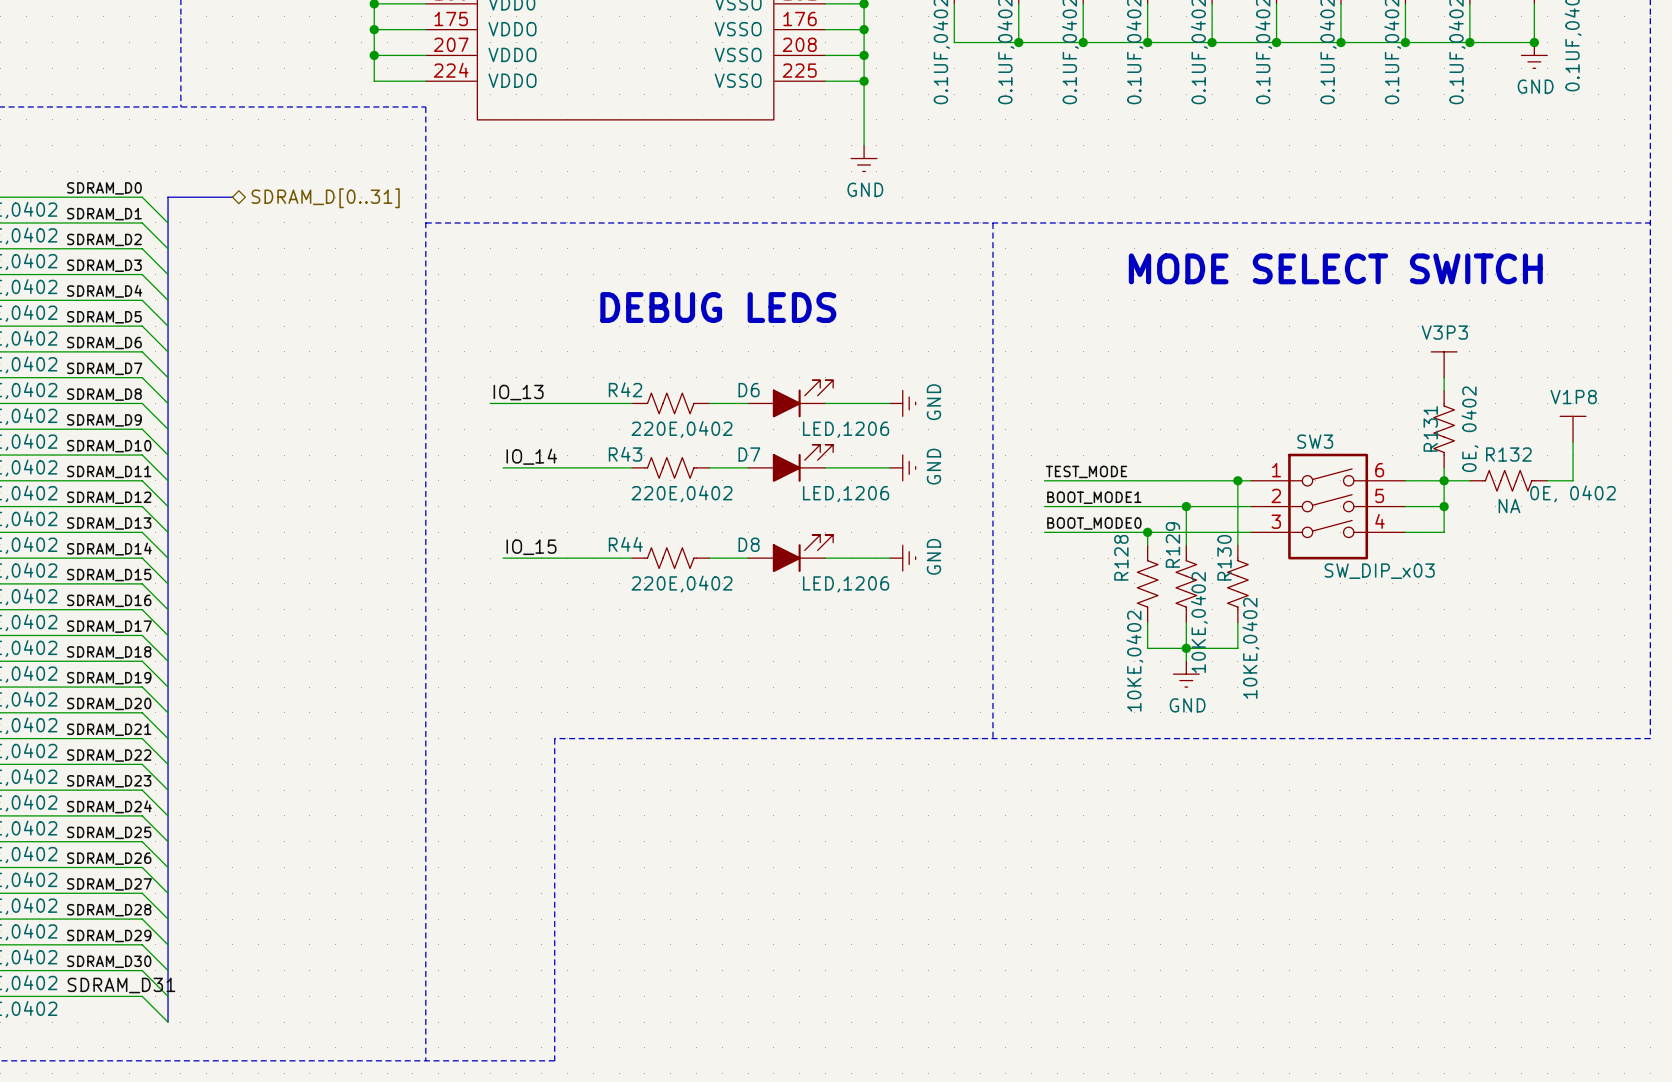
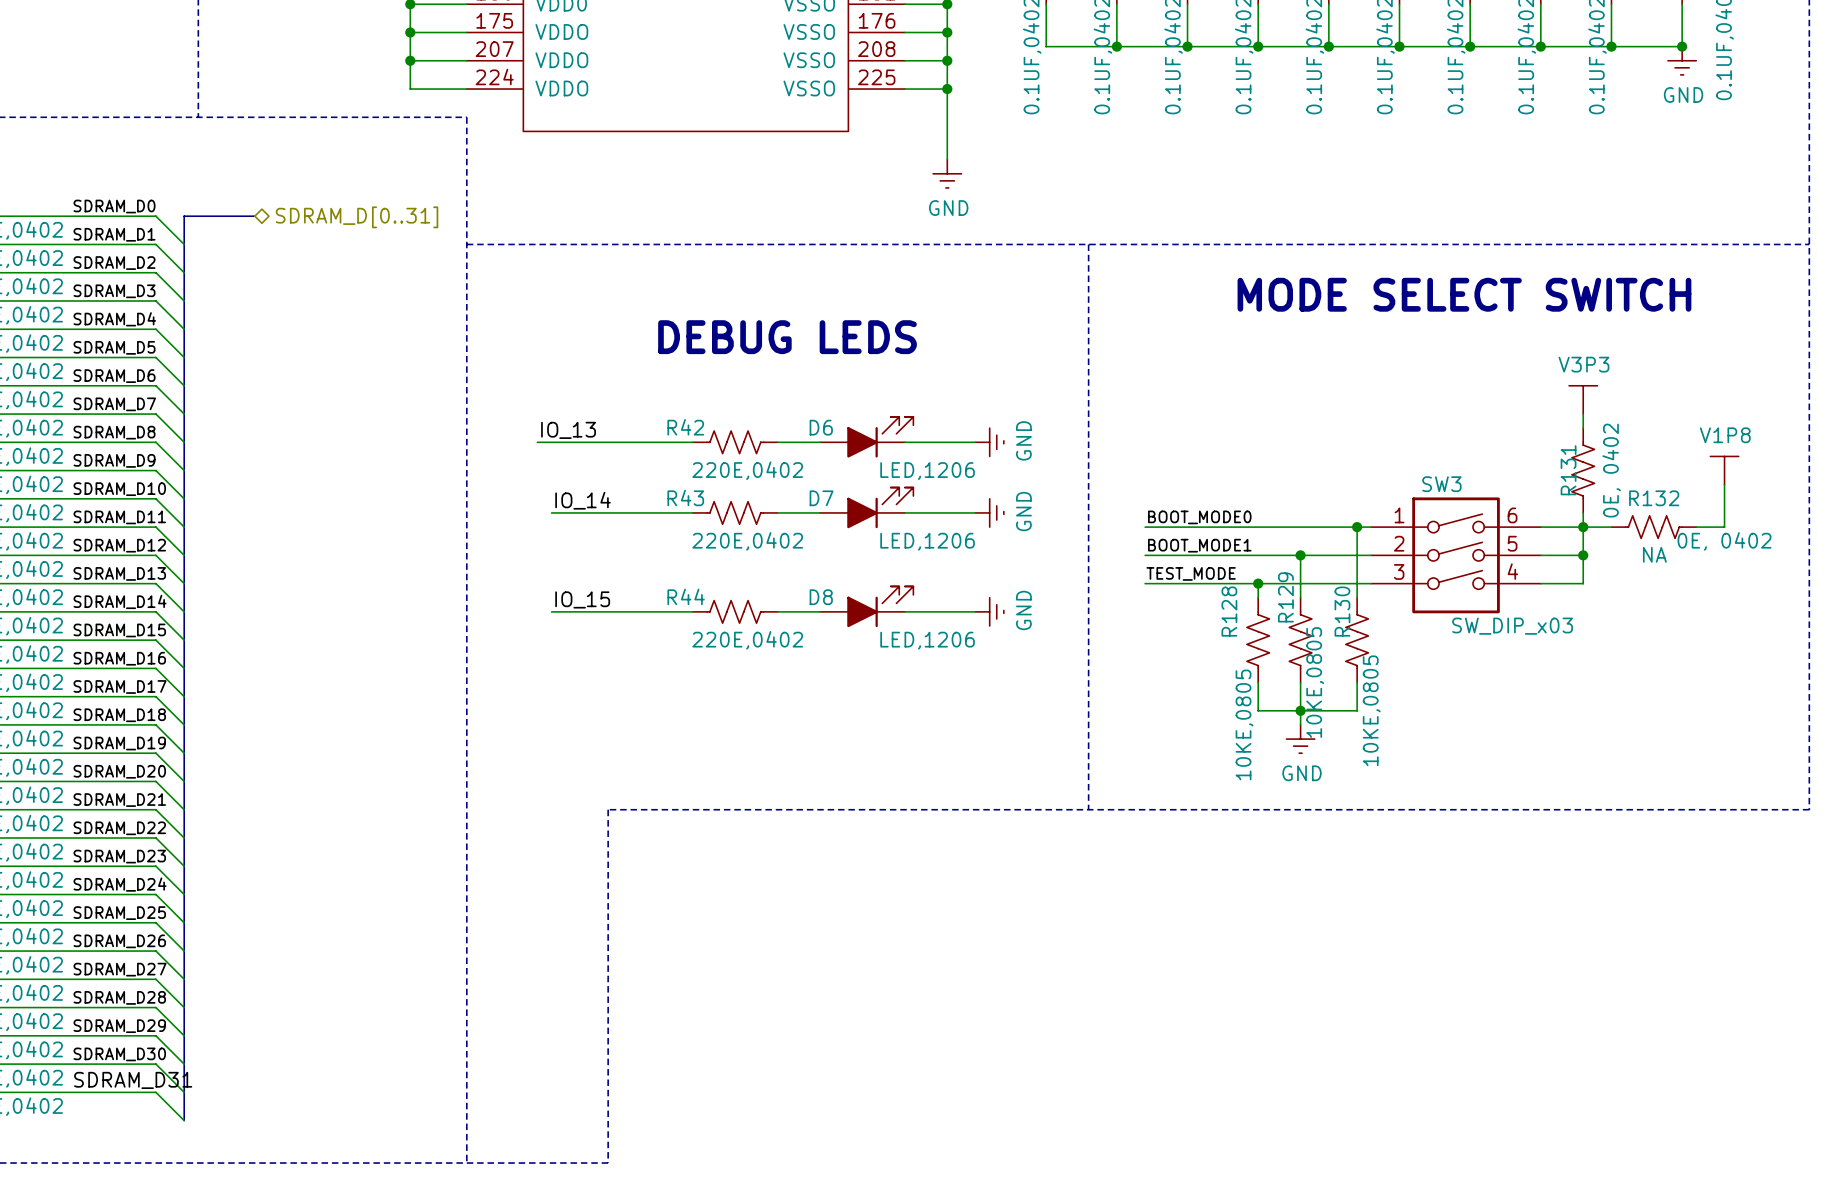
label: TEST_MODE (1086, 471) -> BOOT_MODE0 (1199, 517)
label: BOOT_MODE0 (1094, 523) -> TEST_MODE (1191, 573)
R129 value: 10KE,0402 (1199, 622) -> 10KE,0805 (1315, 682)
R130 value: 10KE,0402 (1250, 648) -> 10KE,0805 (1371, 710)
R128 value: 10KE,0402 (1134, 661) -> 10KE,0805 (1244, 724)

